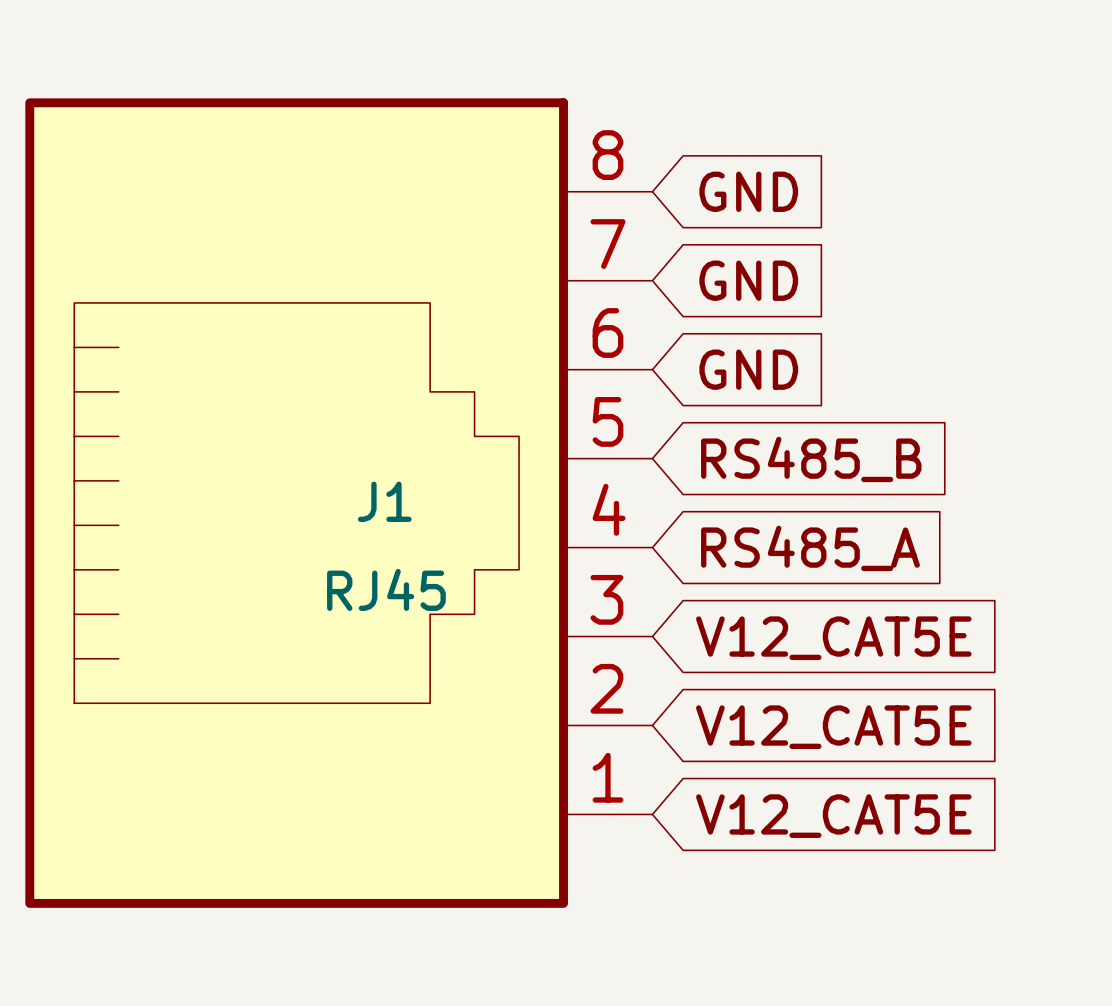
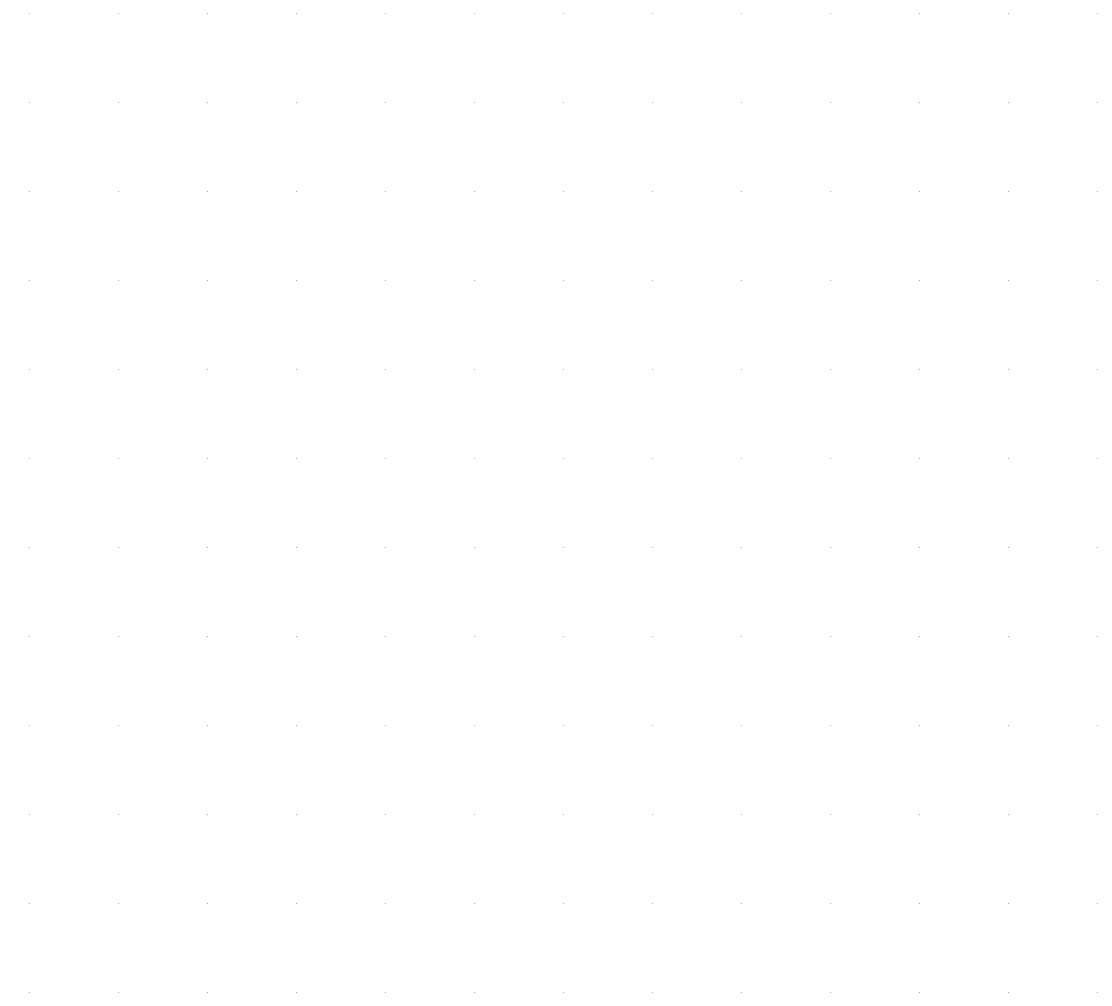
global label: GND (748, 191) -> none
global label: GND (748, 280) -> none
global label: GND (748, 369) -> none
global label: RS485_B (811, 459) -> none
J1: RJ45 (338, 503) -> none
global label: RS485_A (810, 548) -> none
global label: V12_CAT5E (833, 638) -> none
global label: V12_CAT5E (833, 727) -> none
global label: V12_CAT5E (833, 816) -> none

